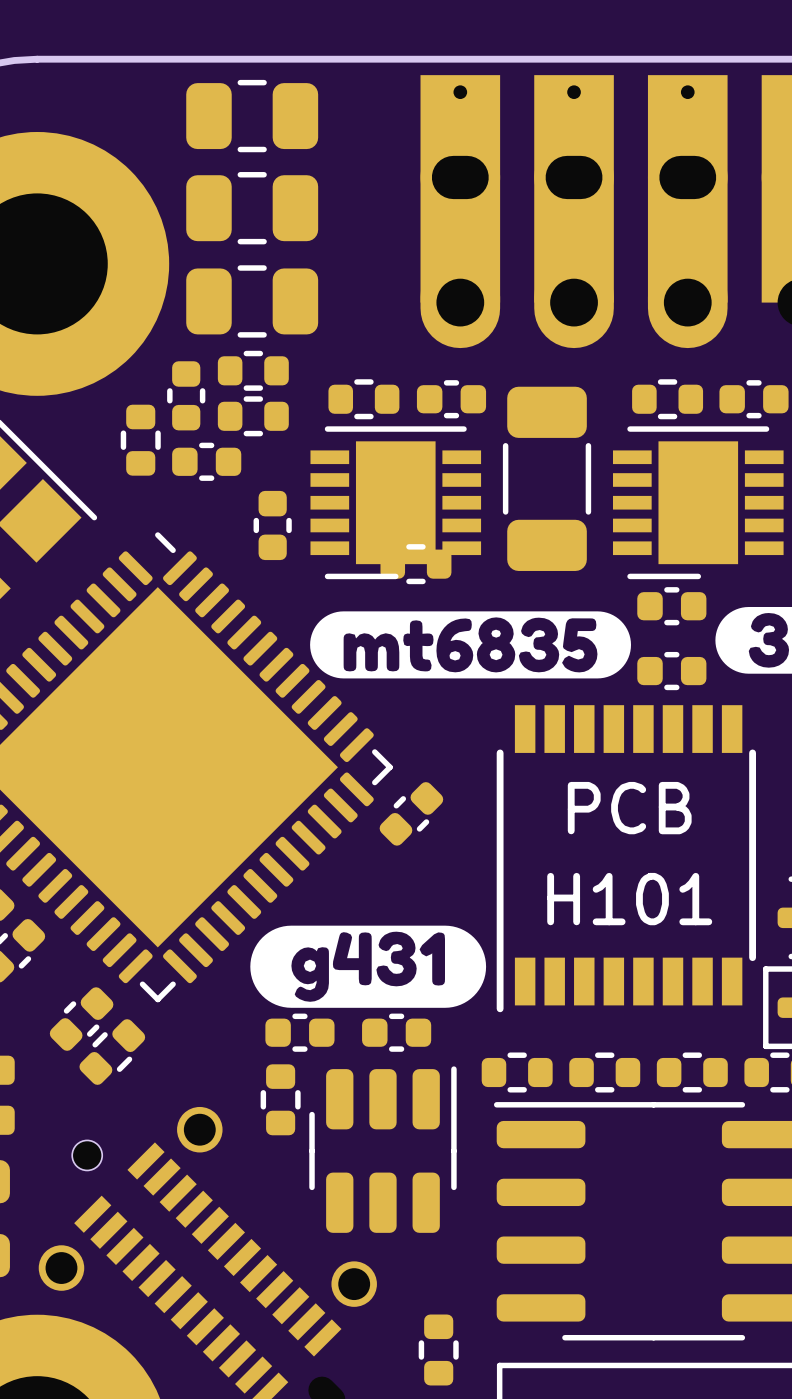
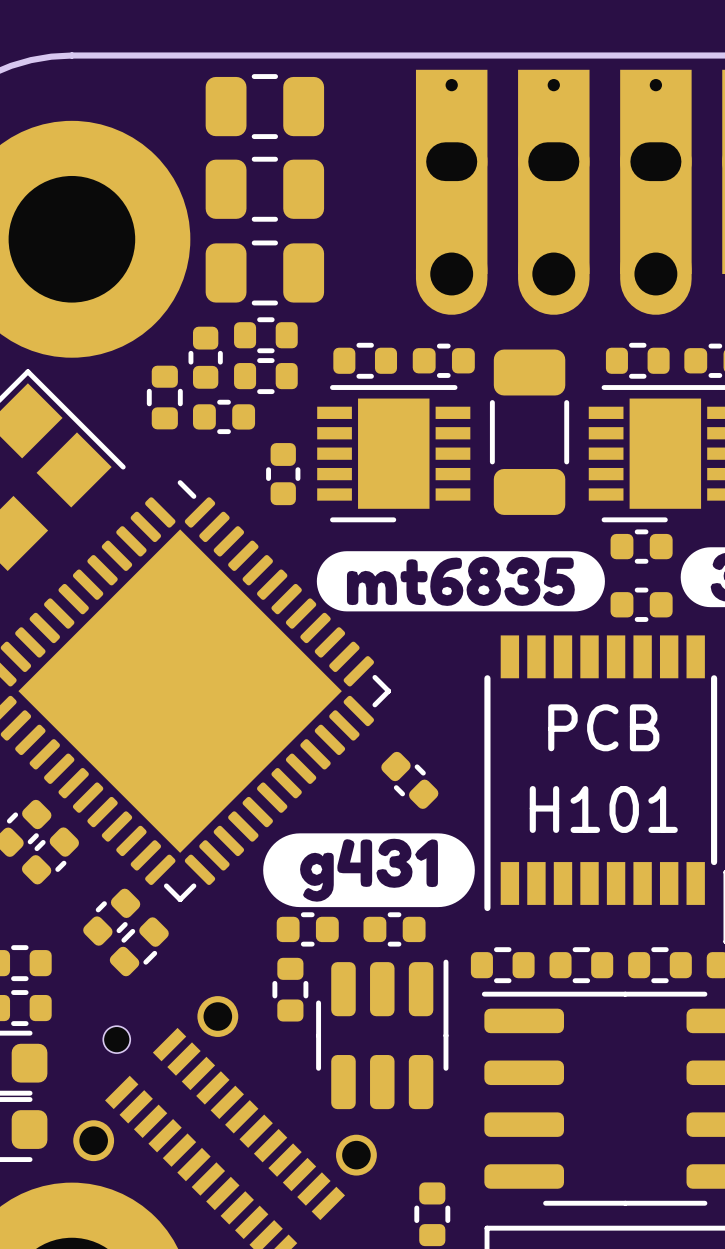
part: (415, 564) -> none
part rotation: 0° (411, 813) -> 90° clockwise (409, 780)
part position: (411, 813) -> (409, 780)

